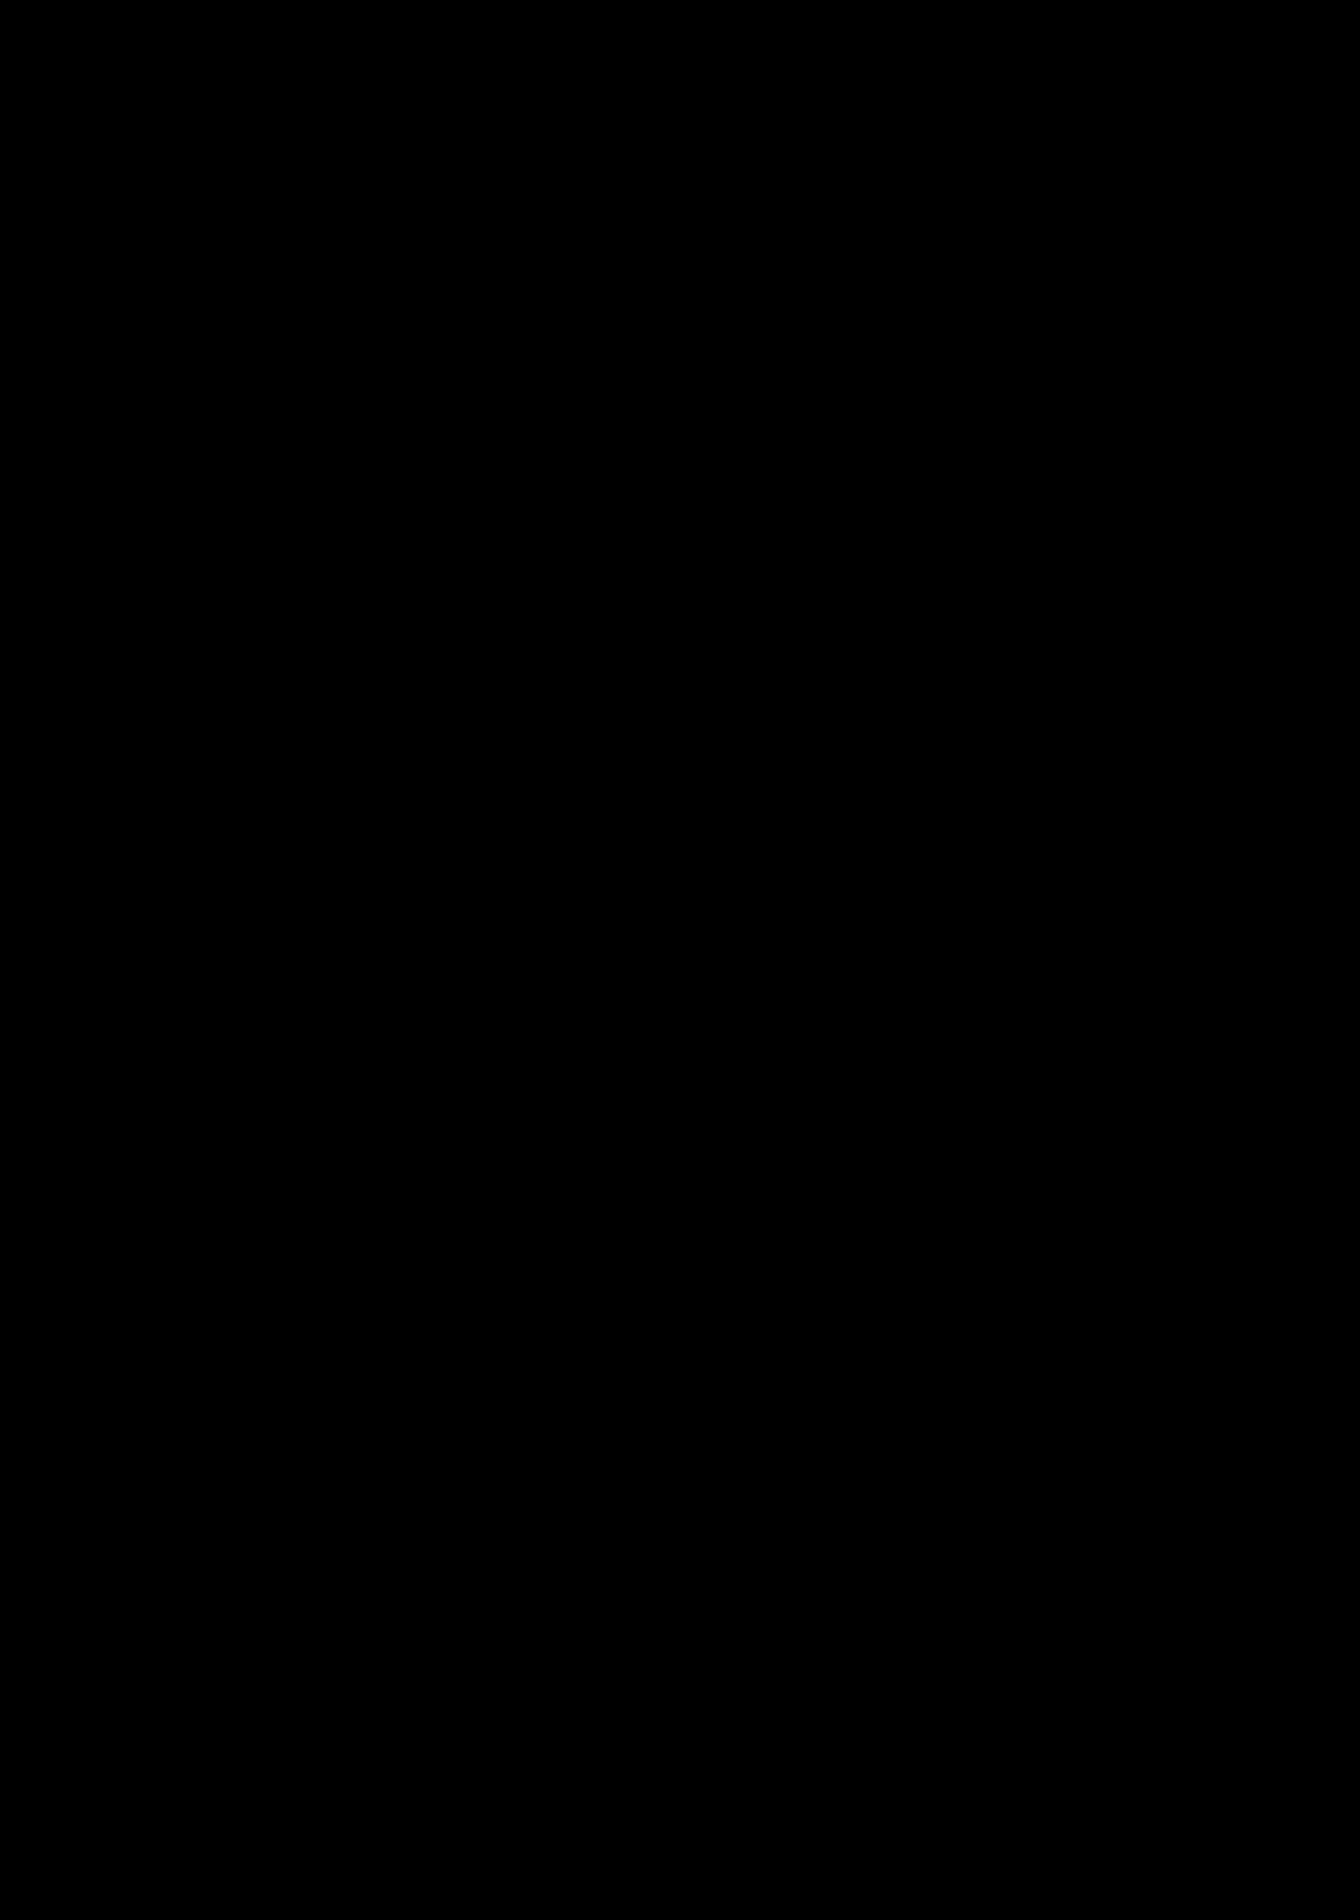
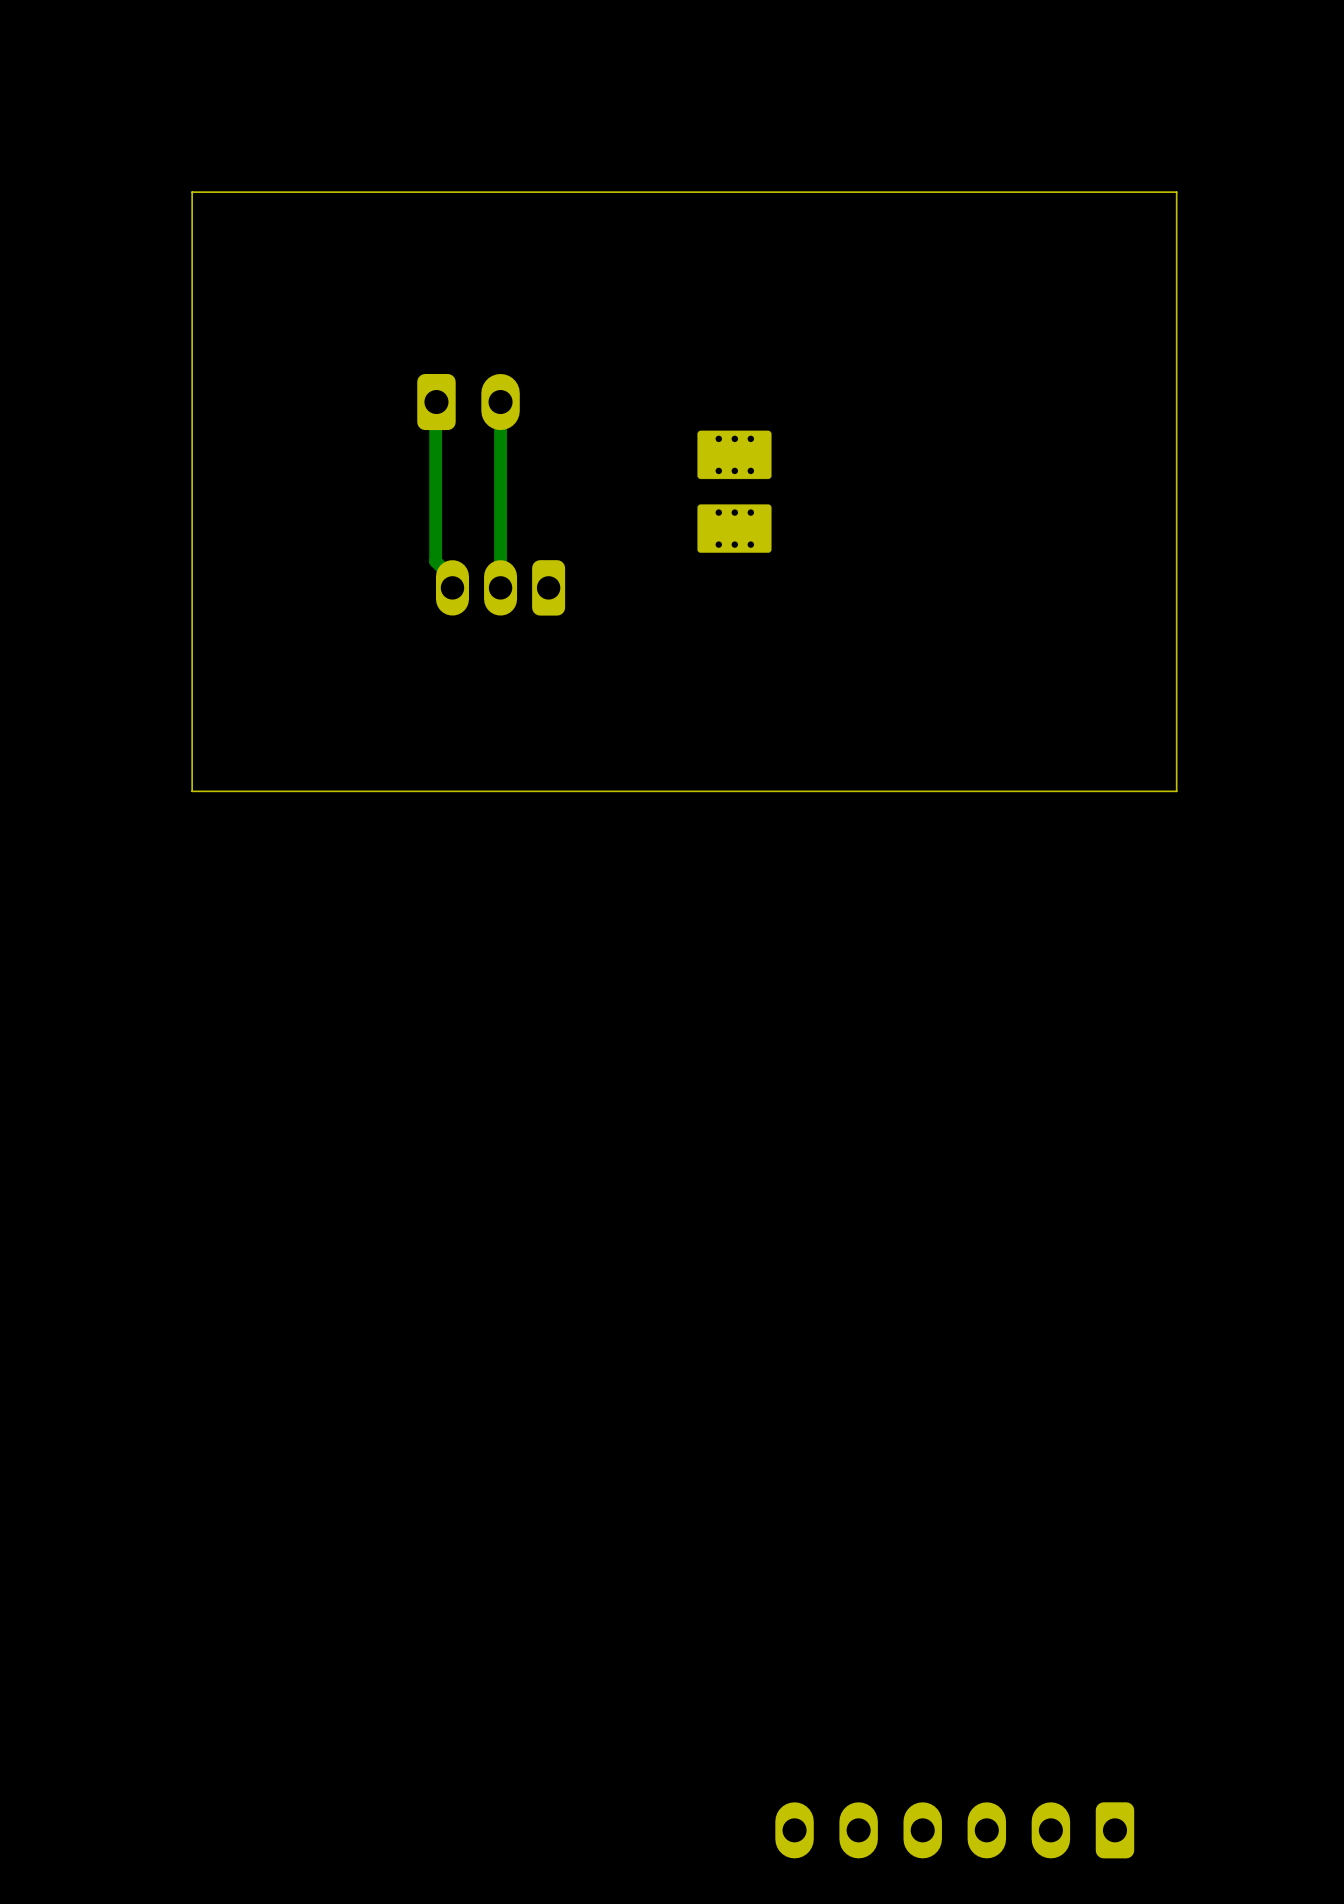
board edge: none -> (1176, 192) (192, 192) (192, 791) (1176, 791) (1176, 192)
track: none -> (436, 402) (435, 561) (452, 578) (452, 587)
part: none -> (468, 402)
track: none -> (500, 402) (500, 587)
part: none -> (734, 491)
part: none -> (500, 587)
part: none -> (954, 1830)

